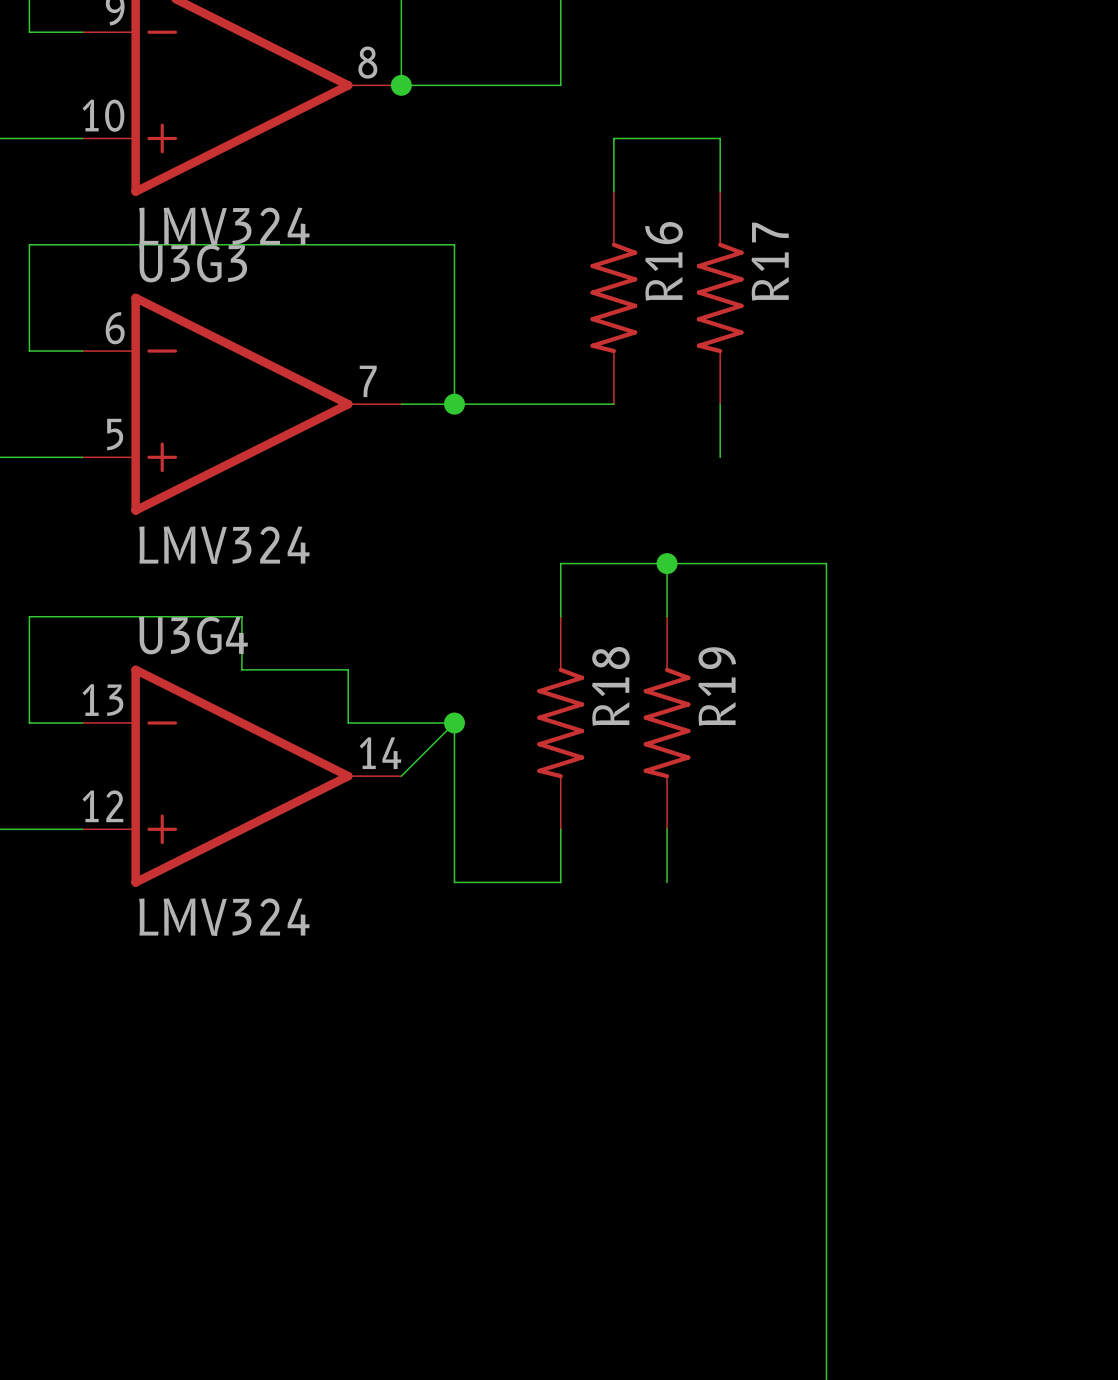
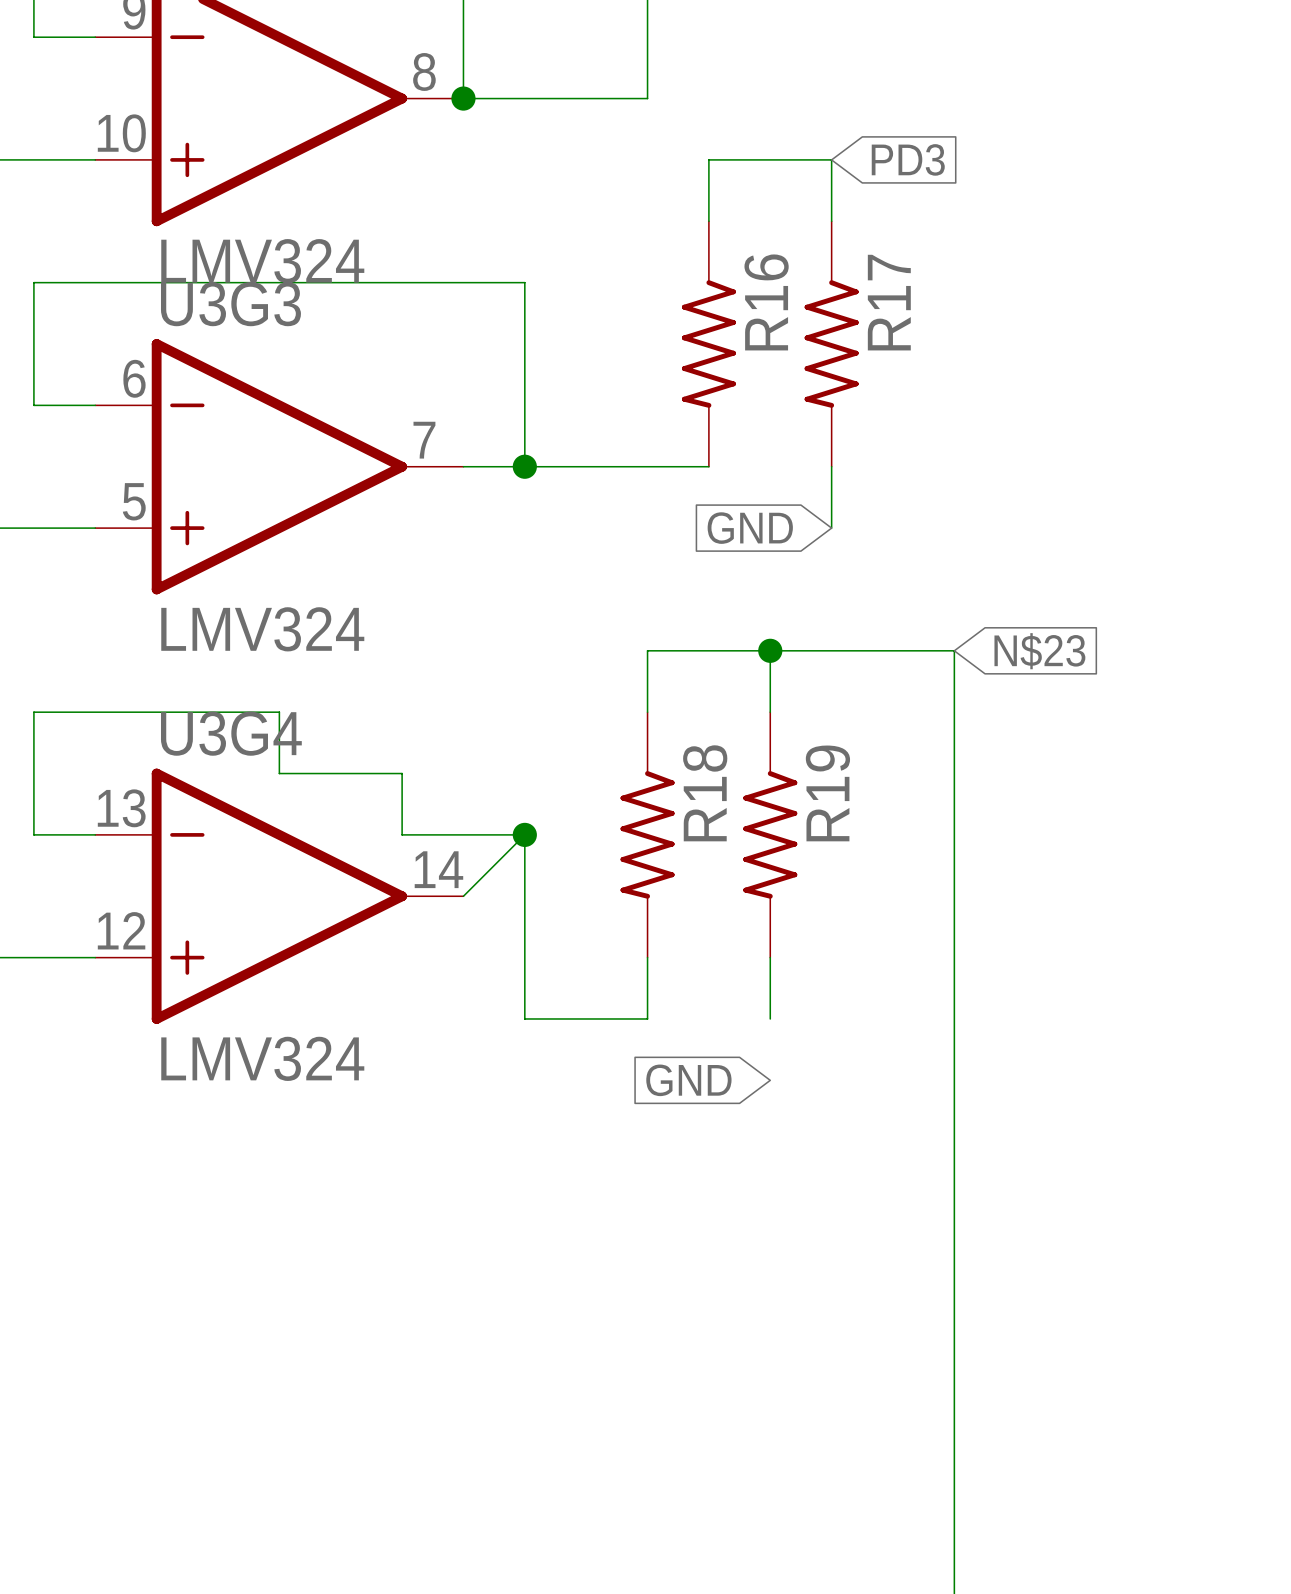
global label: none -> PD3 (908, 159)
global label: none -> GND (750, 528)
global label: none -> N$23 (1039, 651)
global label: none -> GND (688, 1080)

